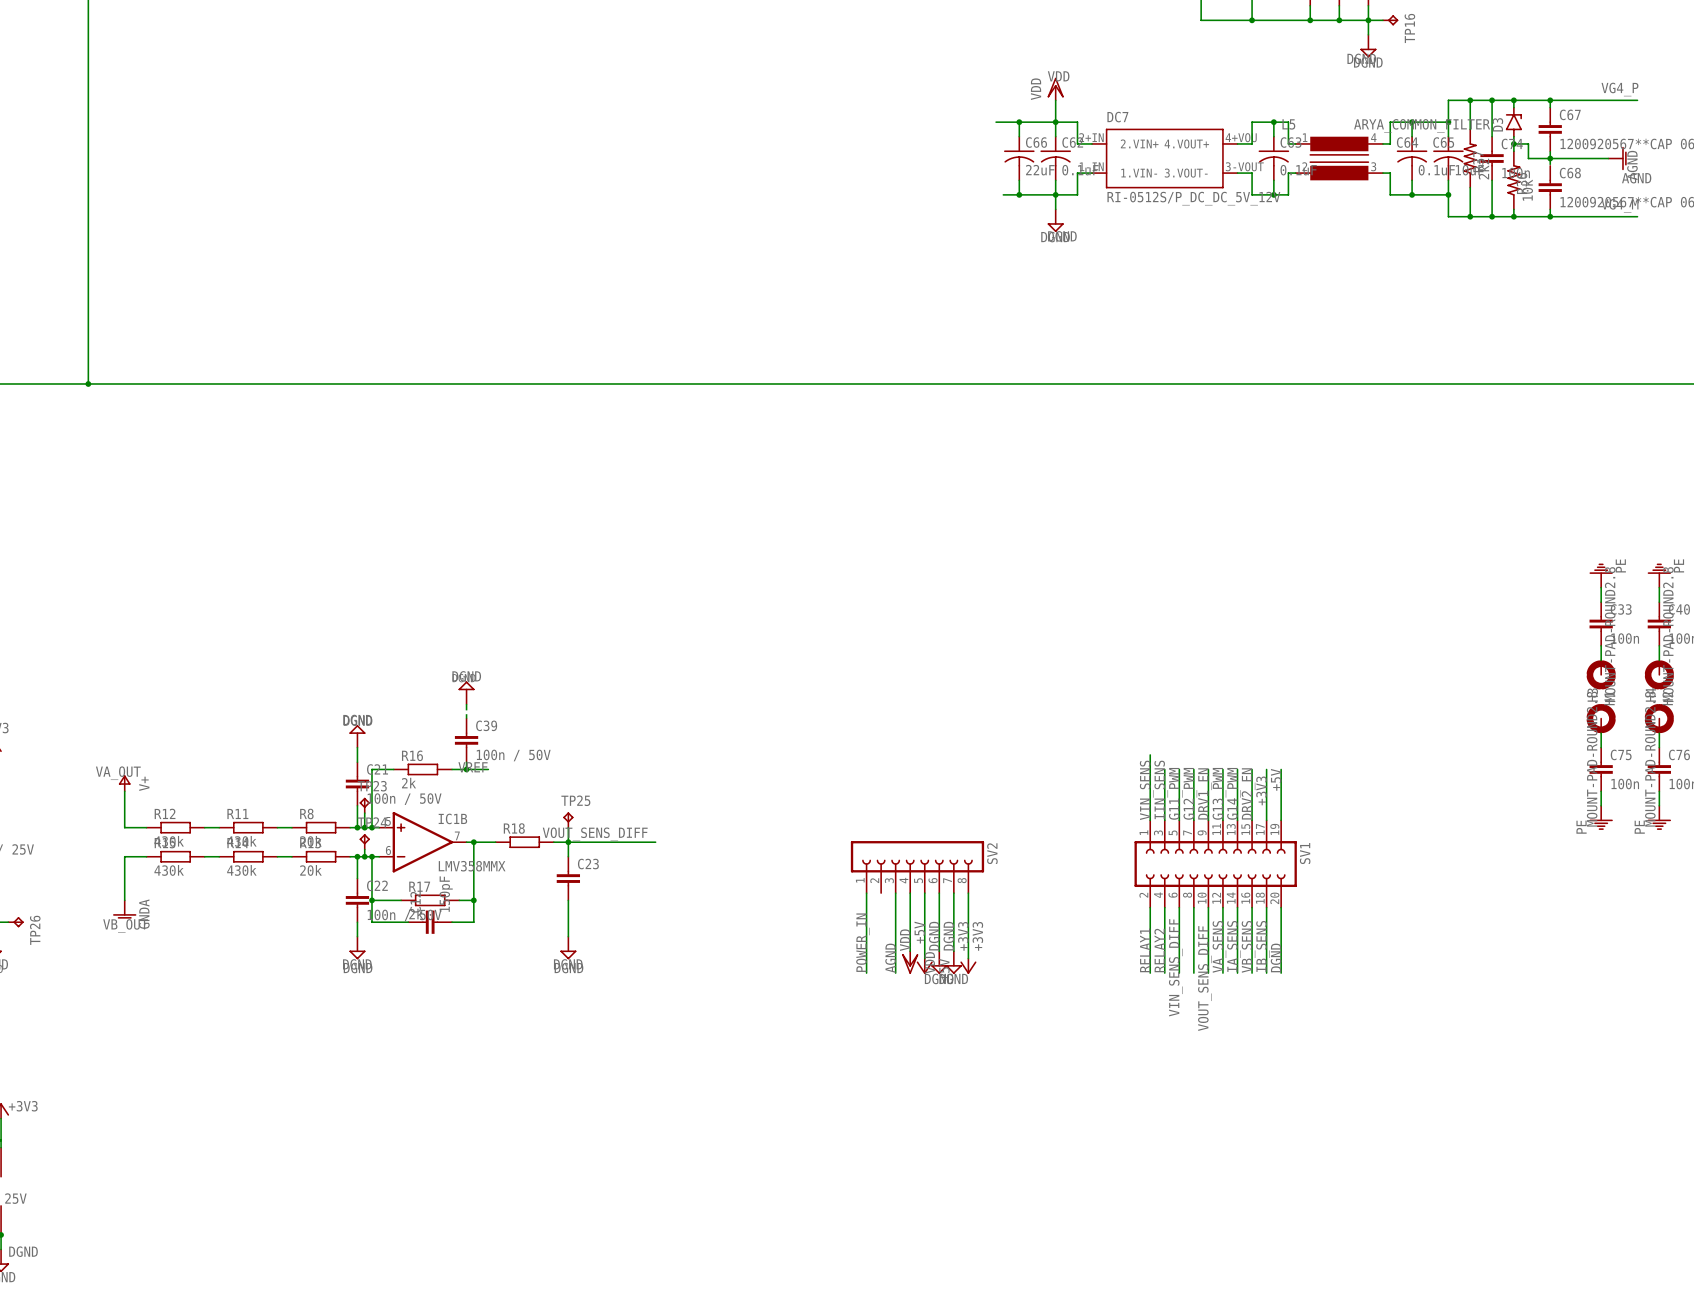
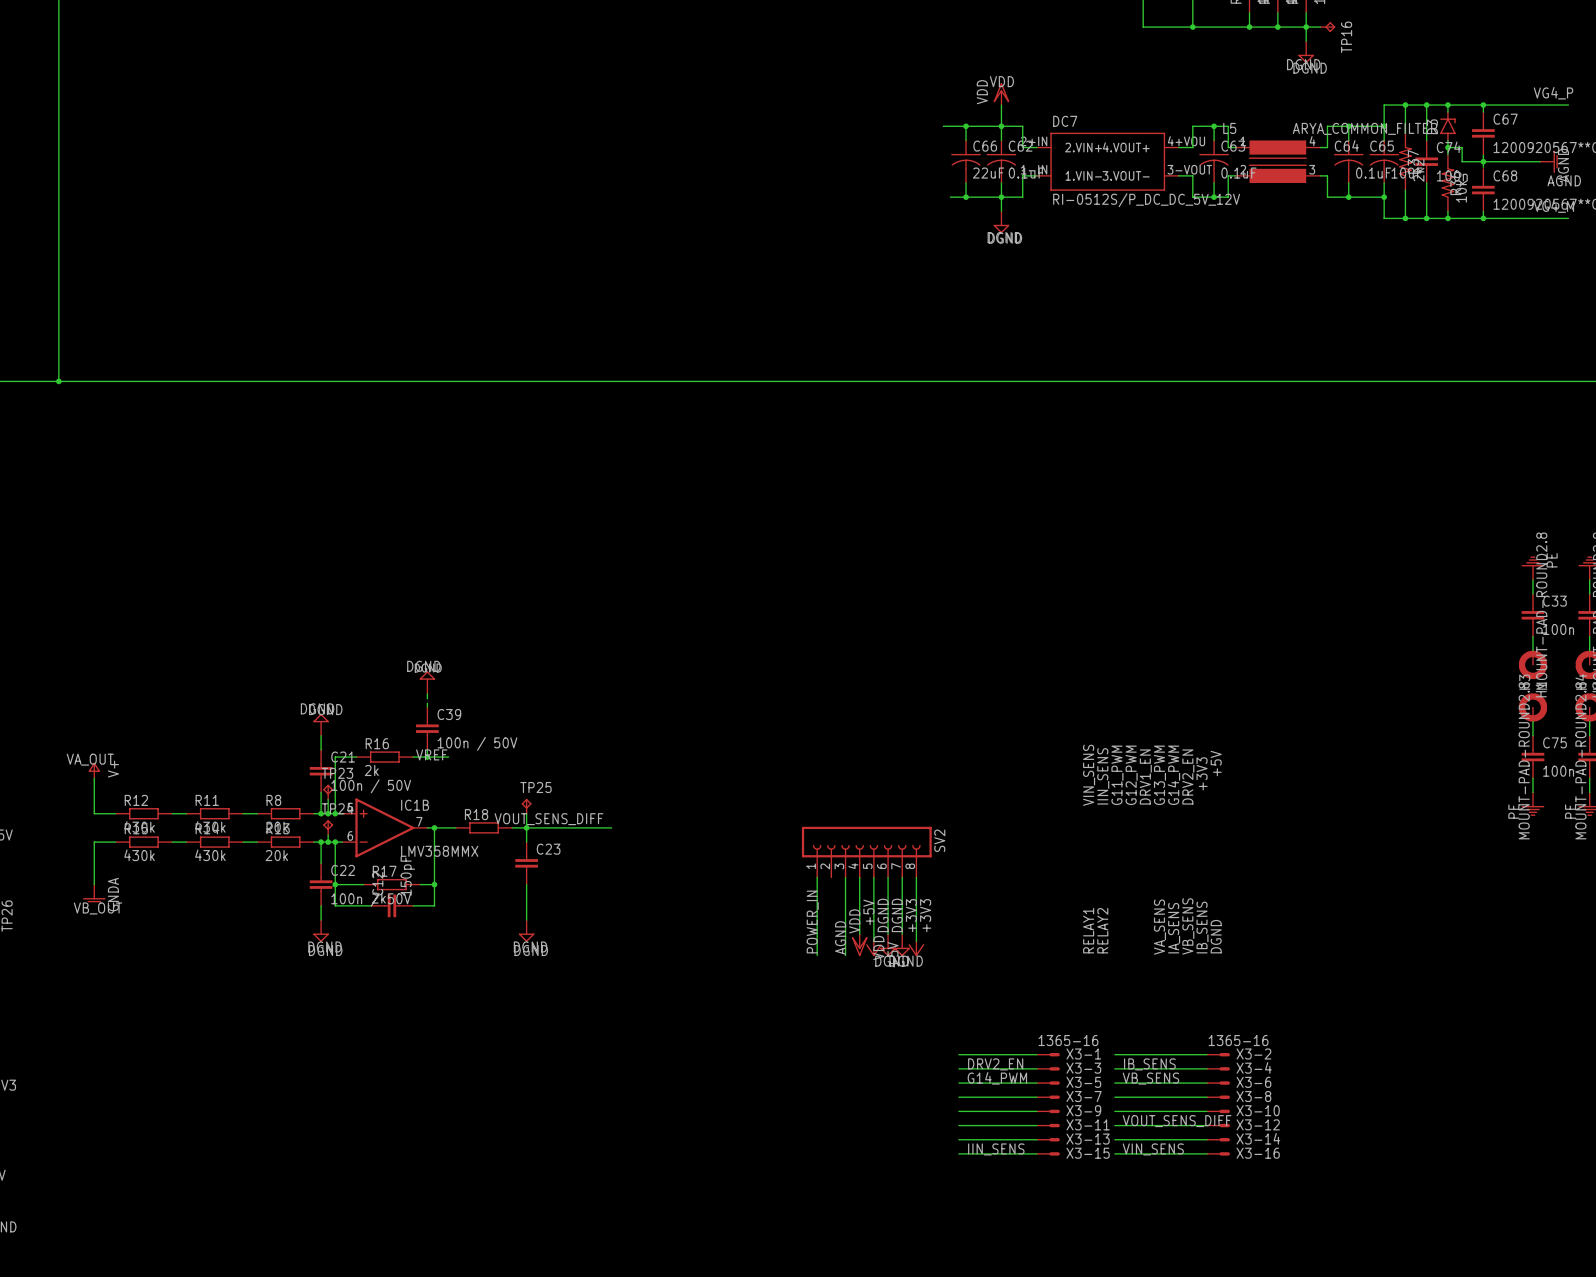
wire: (1150, 754) (1150, 820) -> none
wire: (1164, 769) (1164, 820) -> none
wire: (1179, 769) (1179, 820) -> none
wire: (1193, 769) (1193, 820) -> none
wire: (1208, 769) (1208, 820) -> none
wire: (1222, 769) (1222, 820) -> none
wire: (1237, 769) (1237, 820) -> none
wire: (1252, 769) (1252, 820) -> none
wire: (1266, 769) (1266, 820) -> none
wire: (1281, 769) (1281, 820) -> none
SV1: (1215, 864) -> none
wire: (1150, 907) (1150, 973) -> none
wire: (1164, 907) (1164, 973) -> none
wire: (1179, 907) (1179, 973) -> none
wire: (1193, 907) (1193, 973) -> none
wire: (1208, 907) (1208, 973) -> none
wire: (1222, 907) (1222, 973) -> none
wire: (1237, 907) (1237, 973) -> none
wire: (1252, 907) (1252, 973) -> none
wire: (1266, 907) (1266, 973) -> none
wire: (1281, 907) (1281, 973) -> none
label: VIN_SENS_DIFF (1175, 967) -> none
label rotation: 0° (1204, 978) -> 90° clockwise (1177, 1121)
label position: VOUT_SENS_DIFF (1204, 978) -> VOUT_SENS_DIFF (1177, 1121)
wire: none -> (958, 1054) (1036, 1054)
X3-1: none -> 1365-16 (1048, 1054)
wire: none -> (1114, 1054) (1206, 1054)
X3-2: none -> 1365-16 (1218, 1054)
label: none -> DRV2_EN (995, 1064)
label: none -> IB_SENS (1149, 1064)
wire: none -> (958, 1068) (1036, 1068)
X3-3: none -> (1048, 1068)
wire: none -> (1114, 1068) (1206, 1068)
X3-4: none -> (1218, 1068)
label: none -> G14_PWM (997, 1078)
label: none -> VB_SENS (1150, 1078)
wire: none -> (958, 1083) (1036, 1083)
X3-5: none -> (1048, 1083)
wire: none -> (1114, 1083) (1206, 1083)
X3-6: none -> (1218, 1083)
wire: none -> (958, 1097) (1036, 1097)
X3-7: none -> (1048, 1097)
wire: none -> (1114, 1097) (1206, 1097)
X3-8: none -> (1218, 1097)
wire: none -> (958, 1111) (1036, 1111)
X3-9: none -> (1048, 1111)
wire: none -> (1114, 1111) (1206, 1111)
X3-10: none -> (1218, 1111)
wire: none -> (958, 1125) (1036, 1125)
X3-11: none -> (1048, 1125)
wire: none -> (1114, 1125) (1206, 1125)
X3-12: none -> (1218, 1125)
wire: none -> (958, 1139) (1036, 1139)
X3-13: none -> (1048, 1139)
wire: none -> (1114, 1139) (1206, 1139)
X3-14: none -> (1218, 1139)
label: none -> IIN_SENS (996, 1149)
label: none -> VIN_SENS (1153, 1149)
wire: none -> (958, 1153) (1036, 1153)
X3-15: none -> (1048, 1153)
wire: none -> (1114, 1153) (1206, 1153)
X3-16: none -> (1218, 1153)

